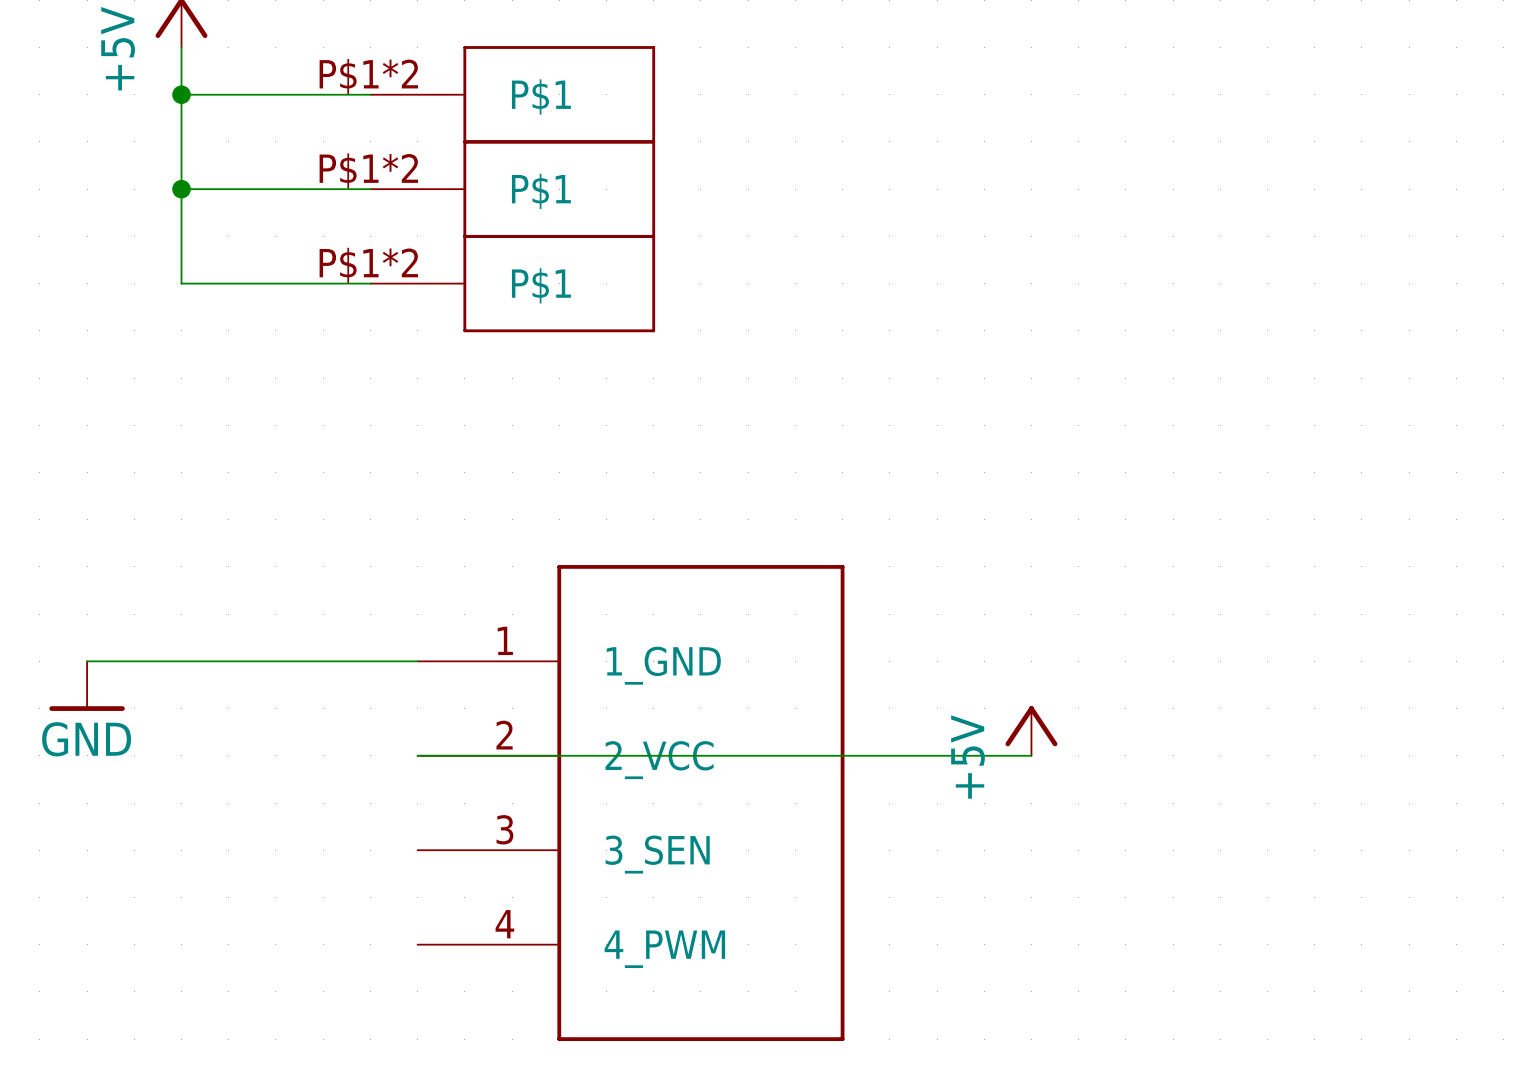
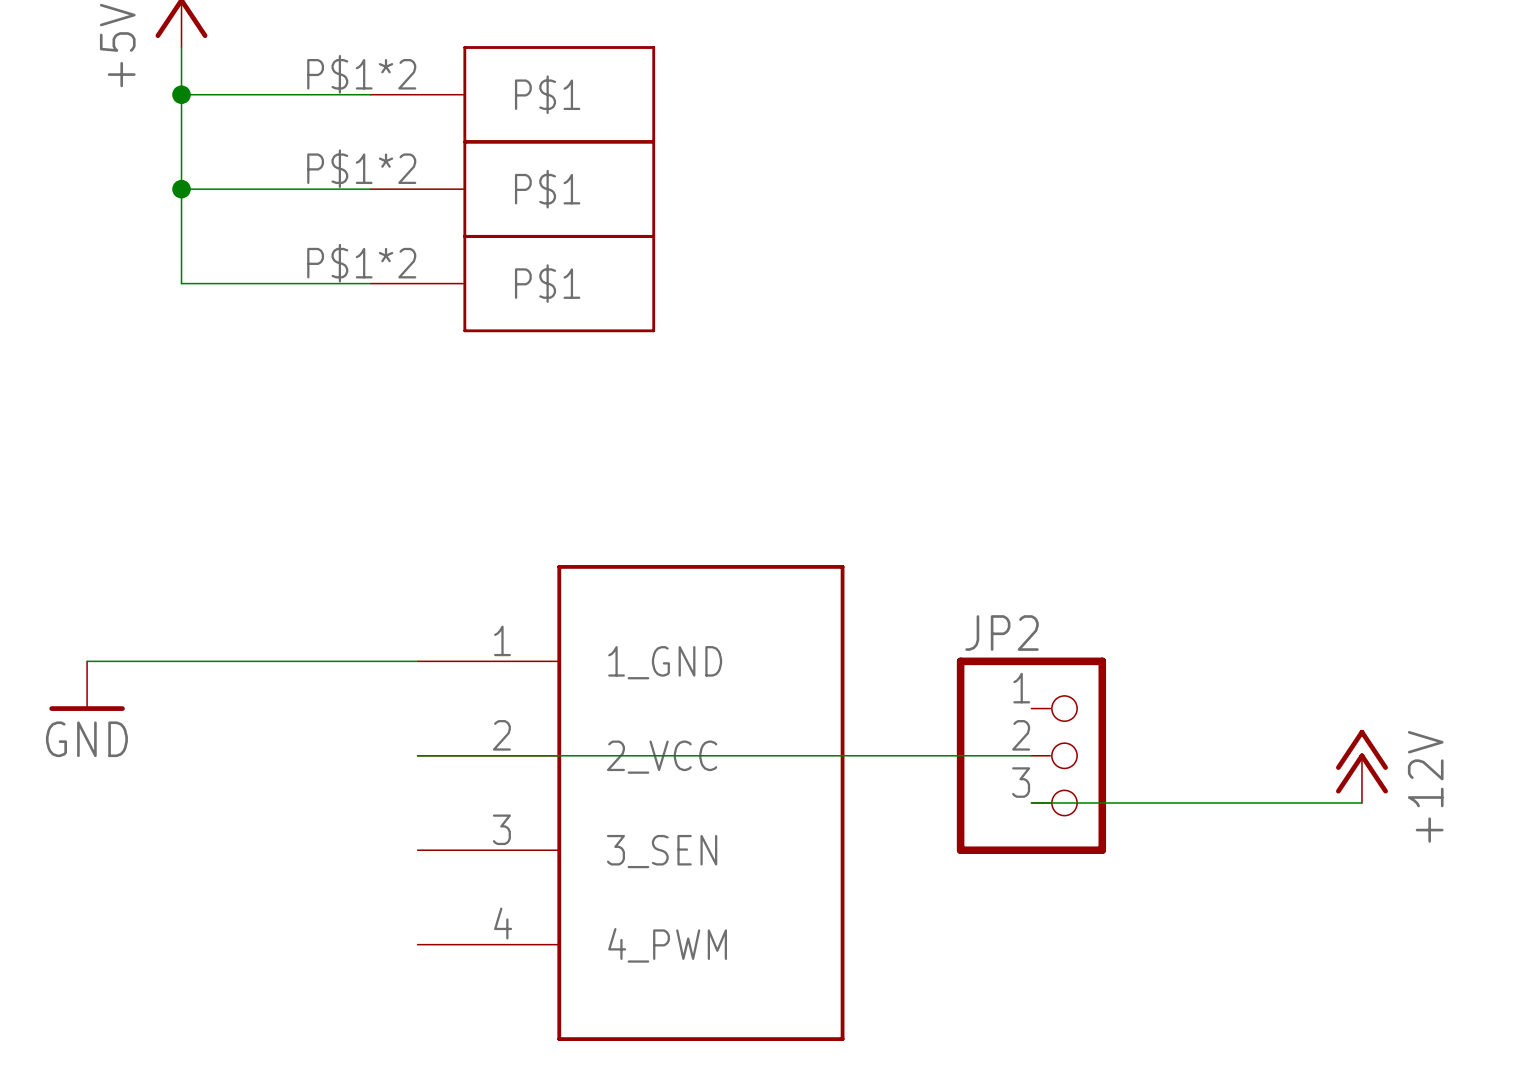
power symbol: +5V (1031, 731) -> none
JP2: none -> (1031, 755)
power symbol: none -> +12V (1361, 766)
wire: none -> (1031, 803) (1361, 803)

